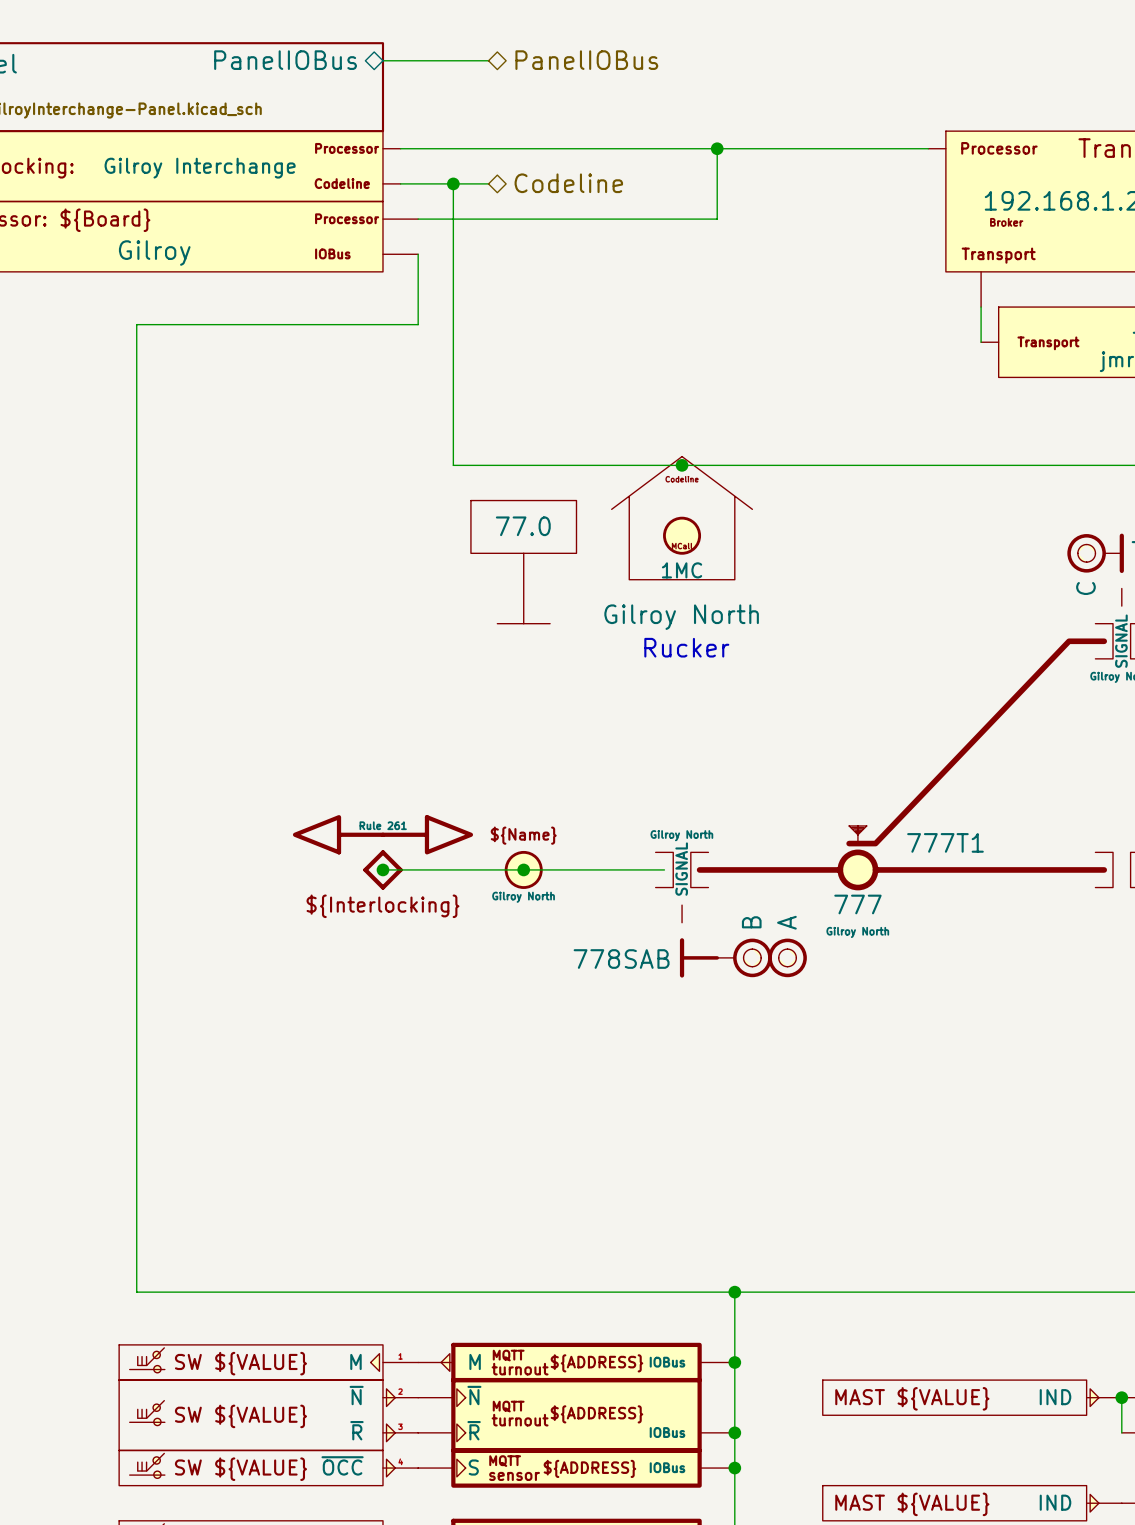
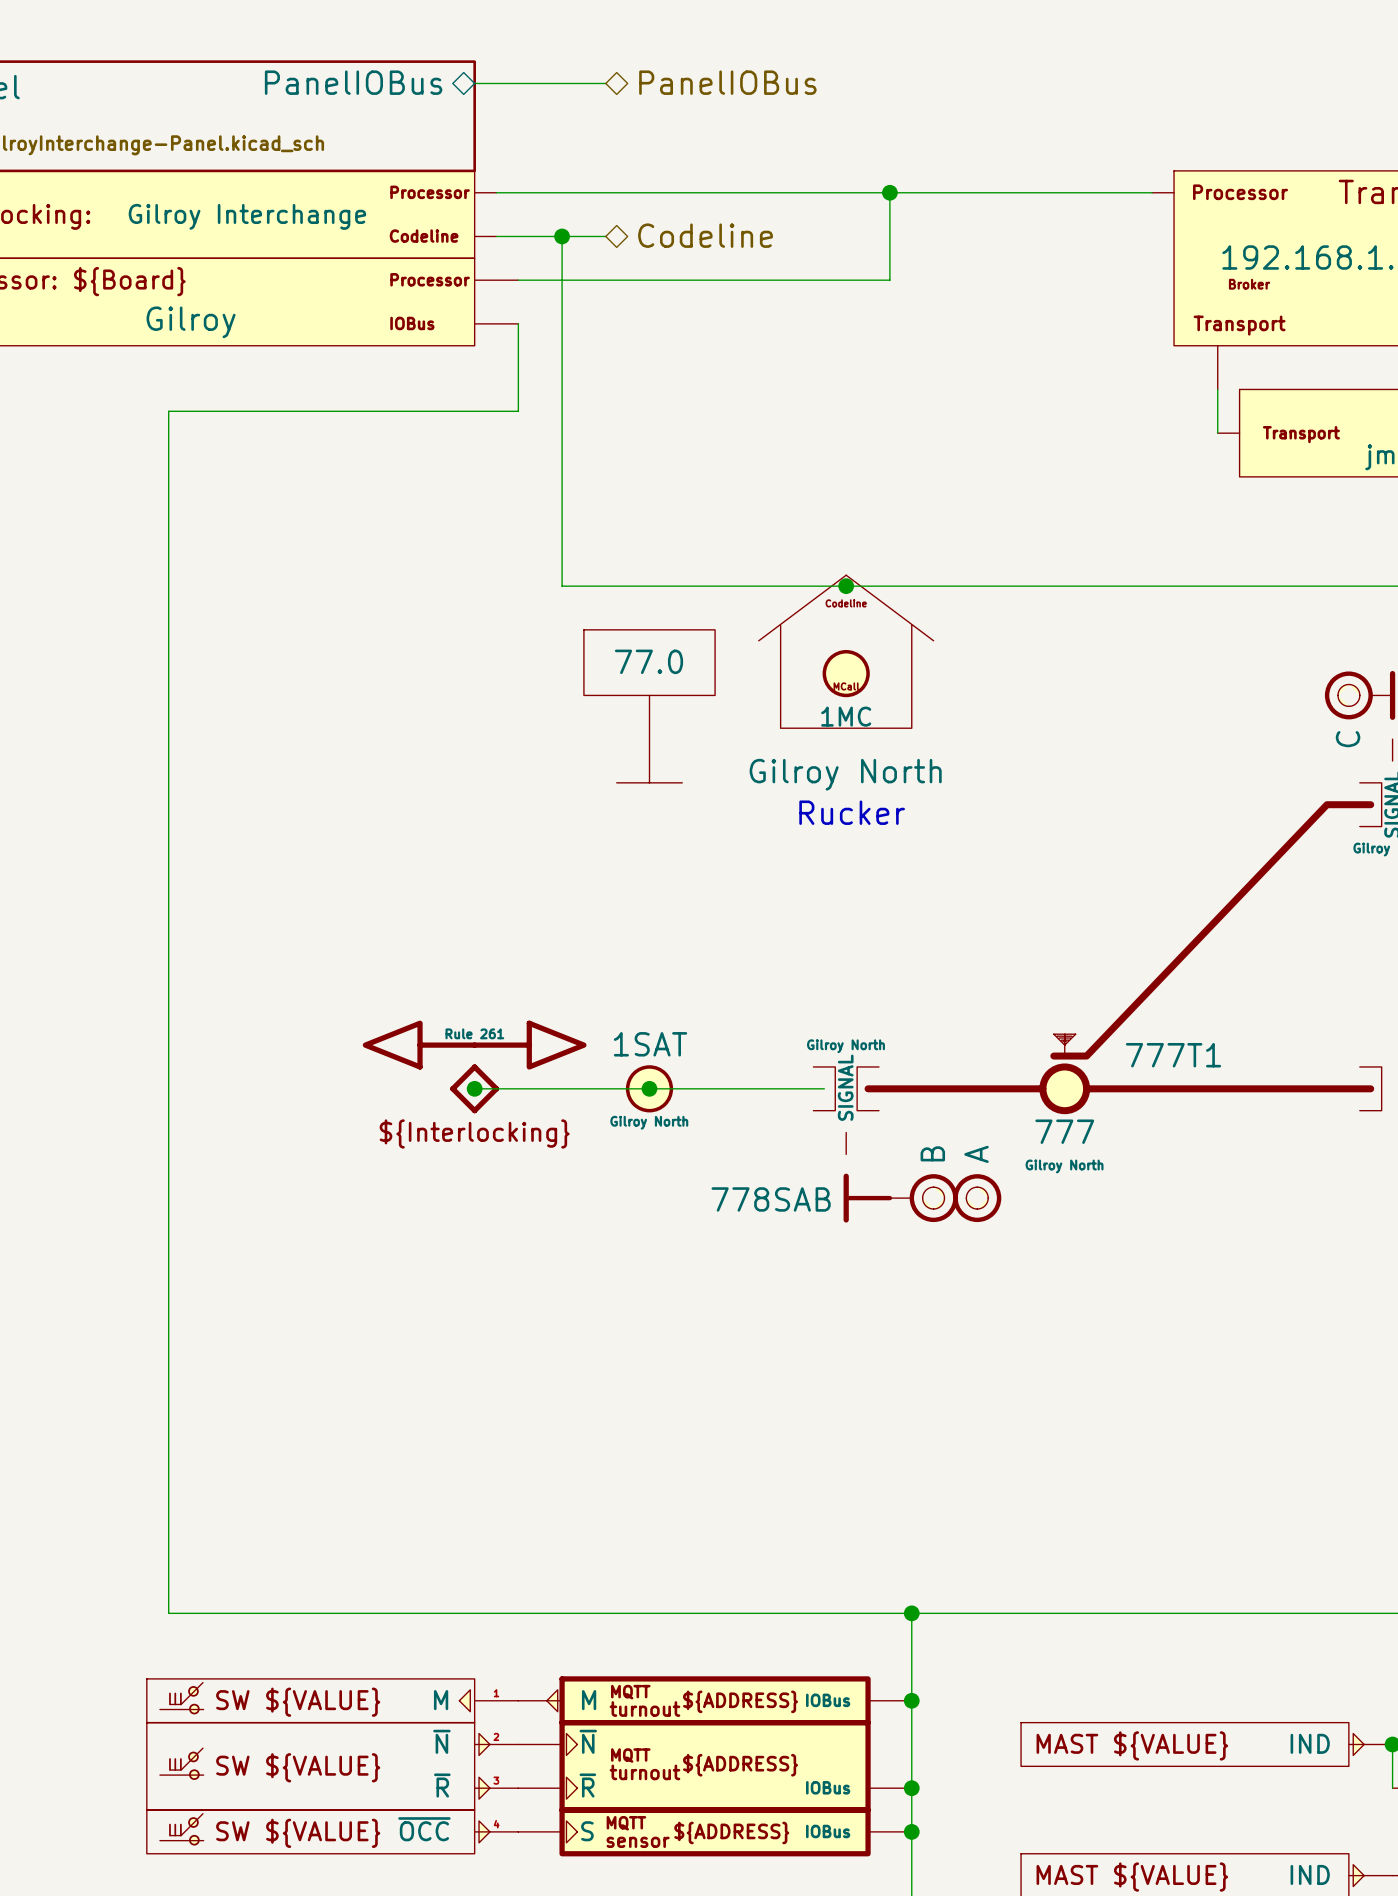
part value: none -> 1SAT (650, 1044)
part text: ${Name} (523, 835) -> none

